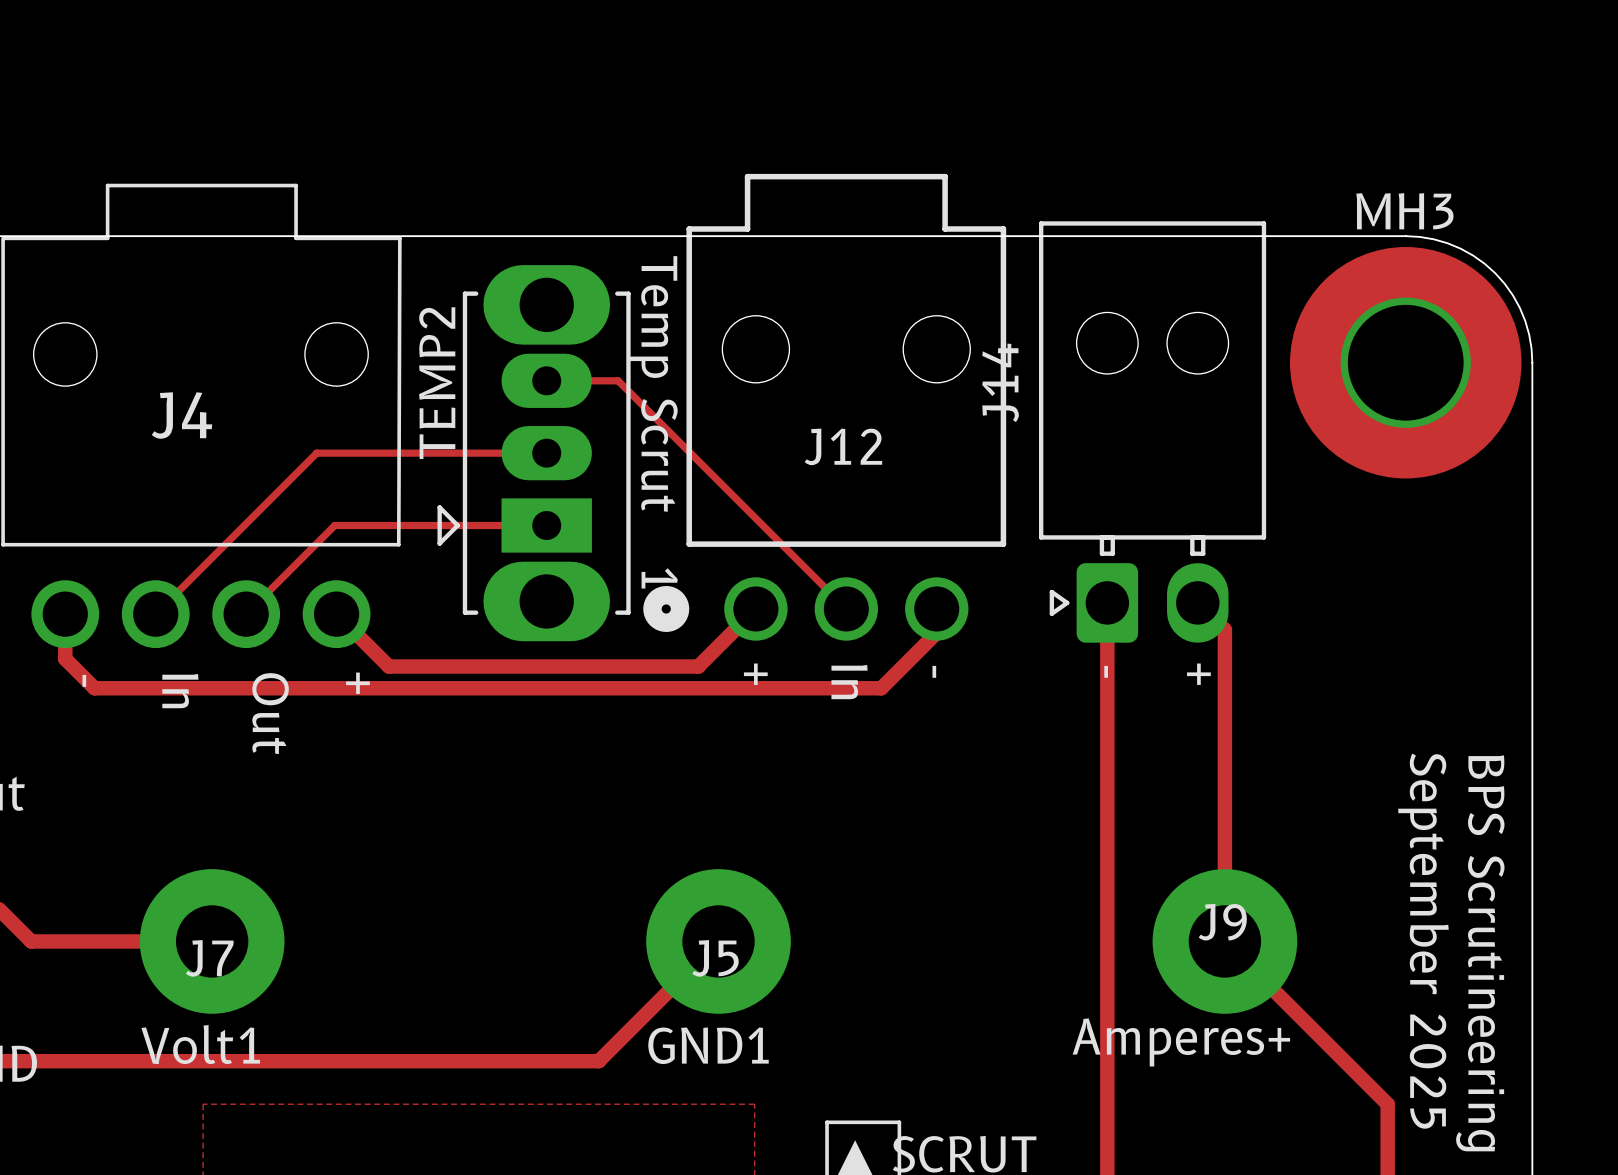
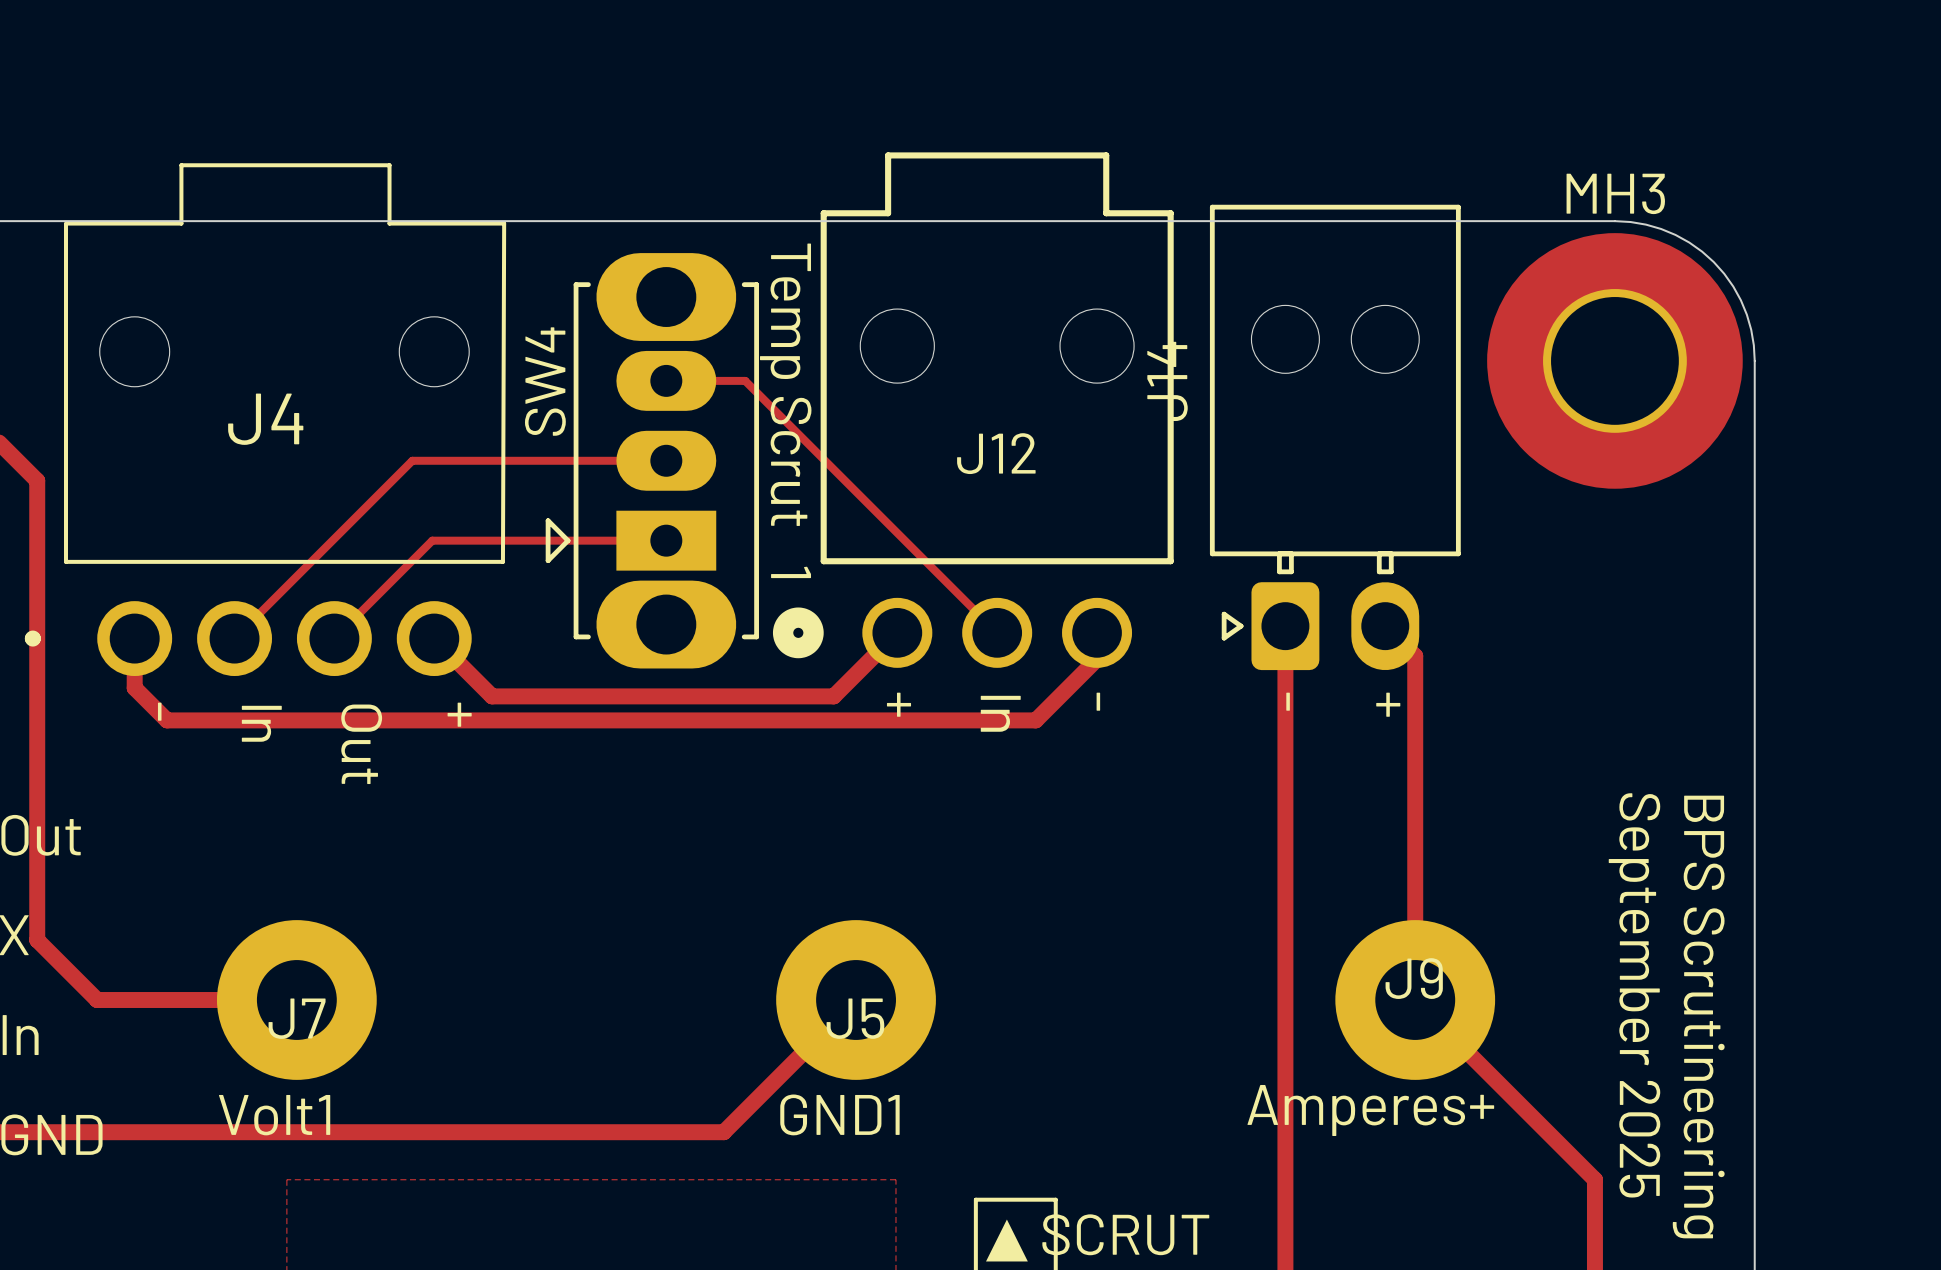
TEMP2 name: TEMP2 (437, 383) -> SW4 (545, 381)

